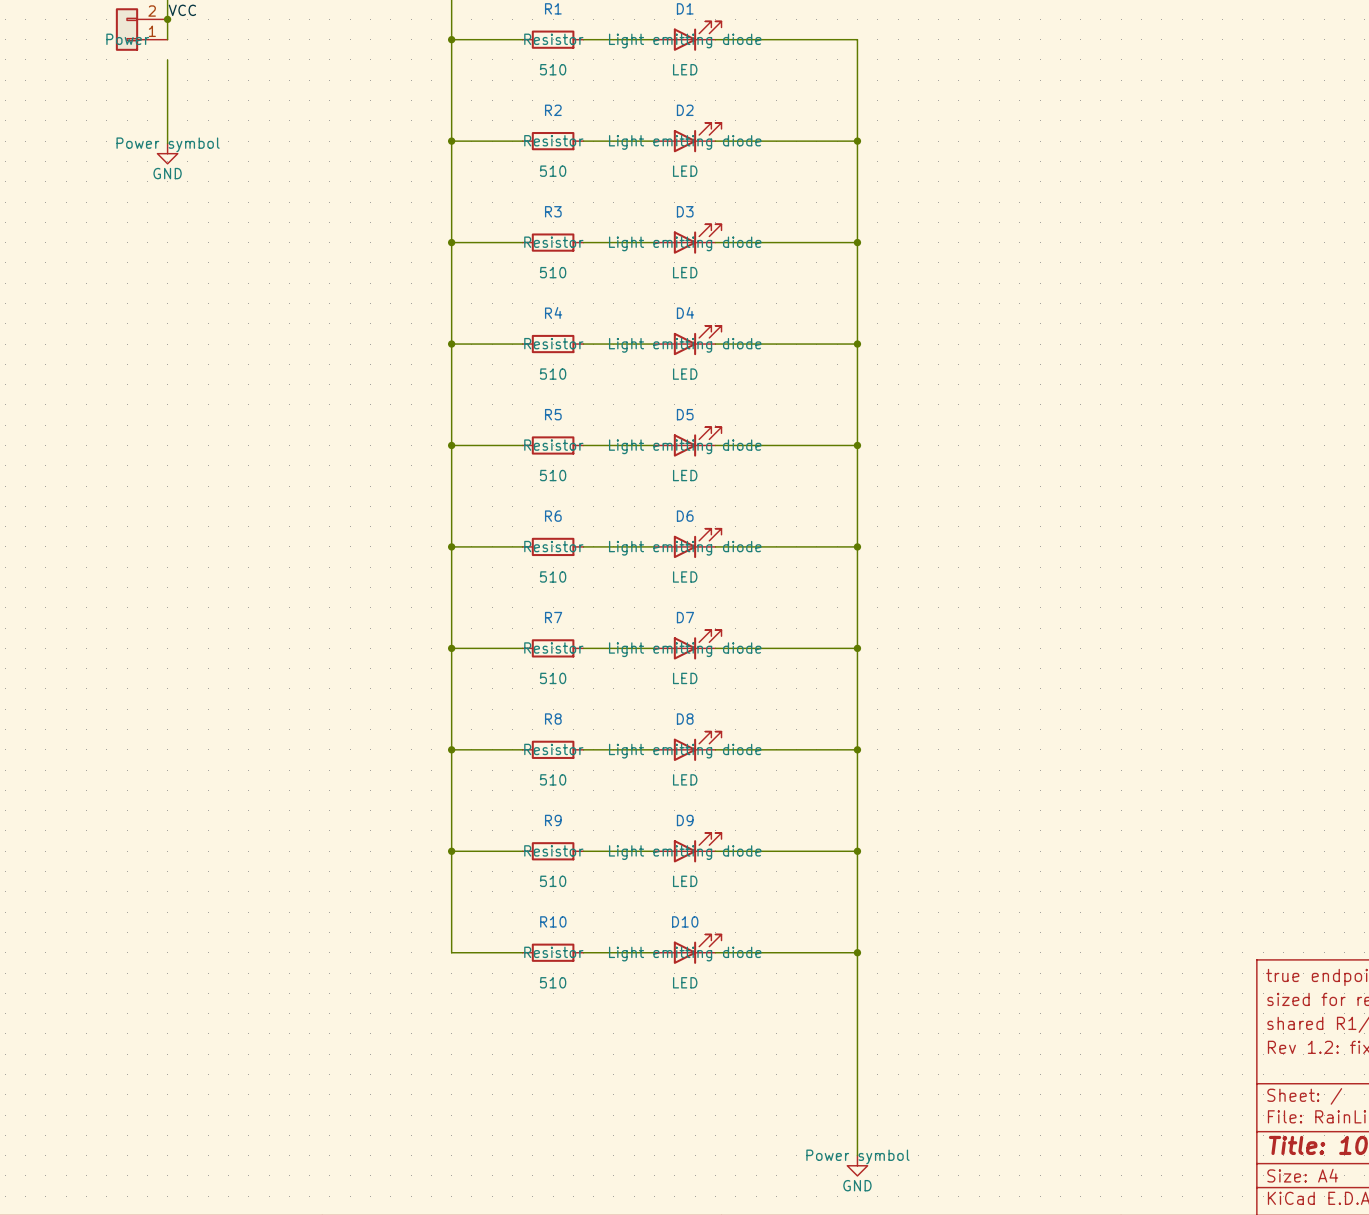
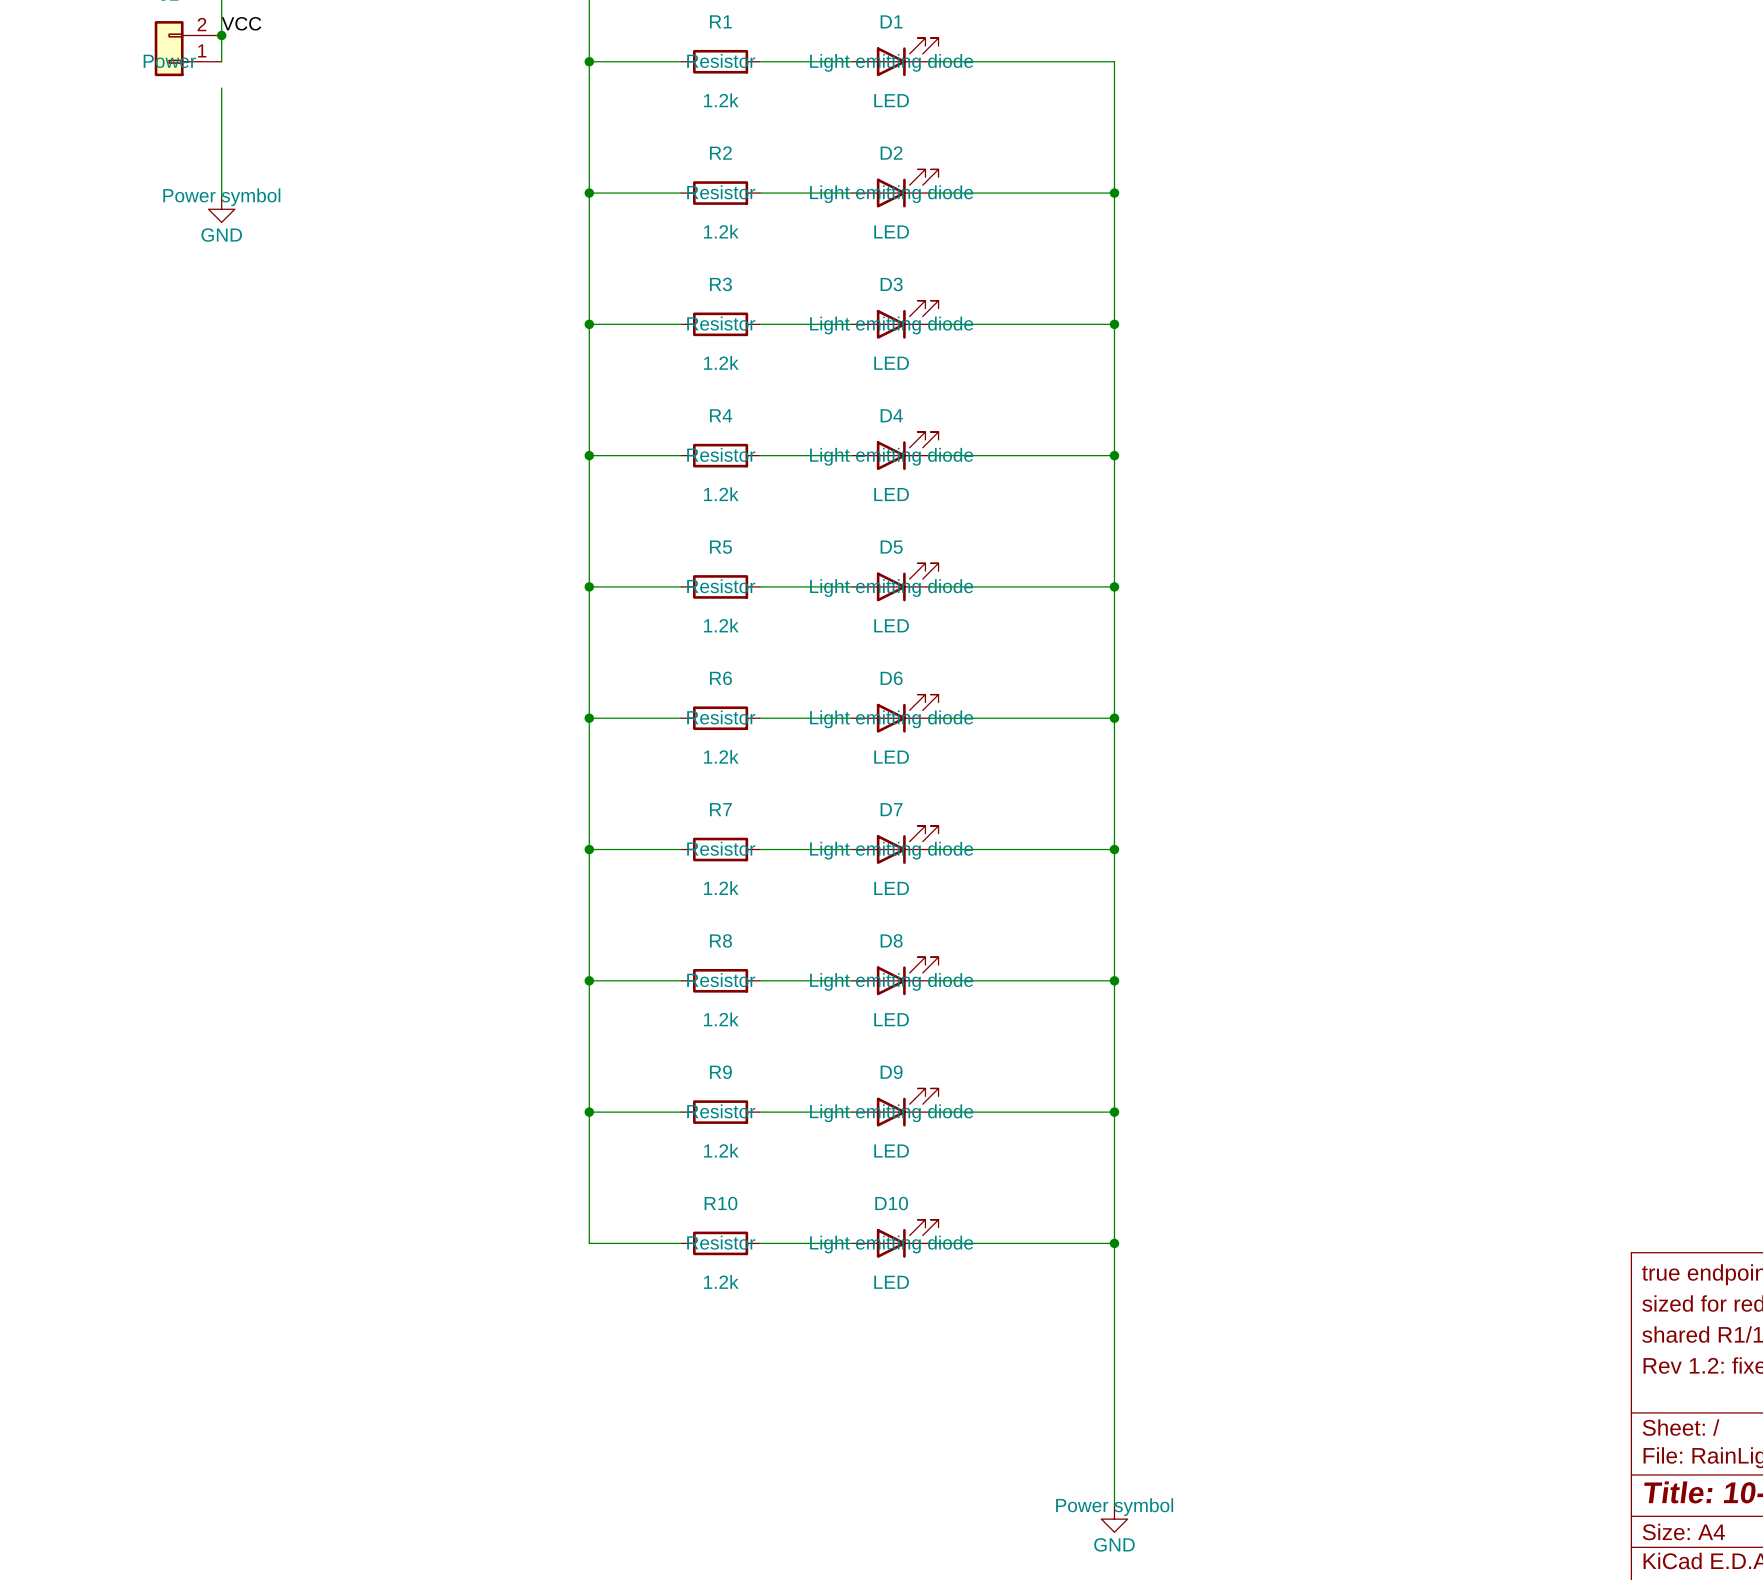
R1 value: 510 (553, 69) -> 1.2k (721, 100)
R2 value: 510 (553, 171) -> 1.2k (721, 231)
R3 value: 510 (553, 272) -> 1.2k (721, 362)
R4 value: 510 (553, 374) -> 1.2k (721, 494)
R5 value: 510 (553, 475) -> 1.2k (721, 625)
R6 value: 510 (553, 576) -> 1.2k (721, 756)
R7 value: 510 (553, 678) -> 1.2k (721, 888)
R8 value: 510 (553, 779) -> 1.2k (721, 1019)
R9 value: 510 (553, 881) -> 1.2k (721, 1150)
R10 value: 510 (553, 982) -> 1.2k (721, 1281)

